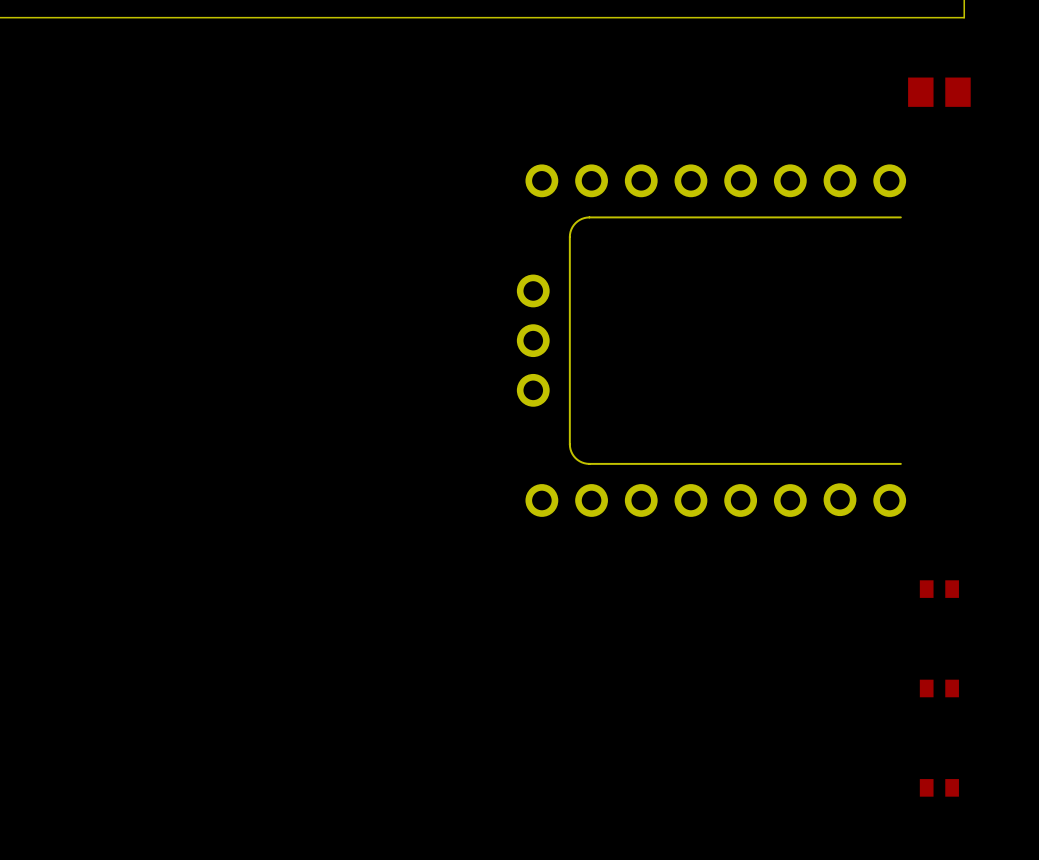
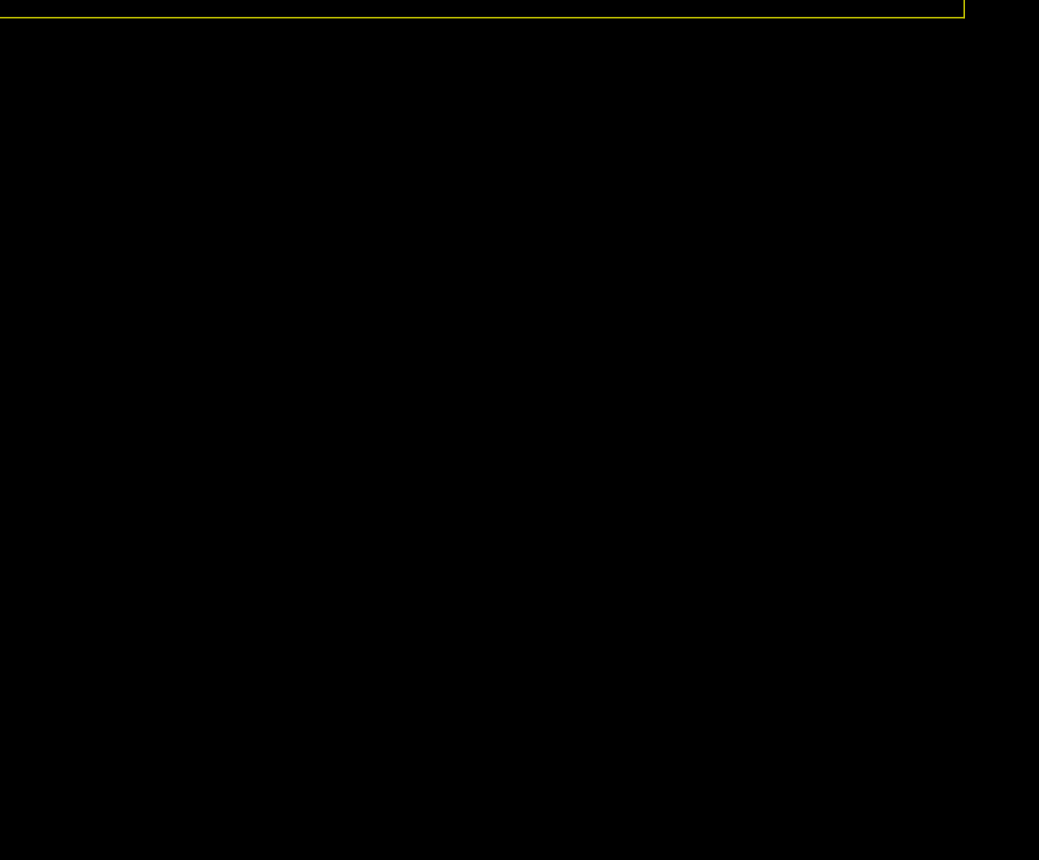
part: (939, 92) -> none
part: (711, 340) -> none
part: (939, 589) -> none
part: (939, 688) -> none
part: (939, 787) -> none

